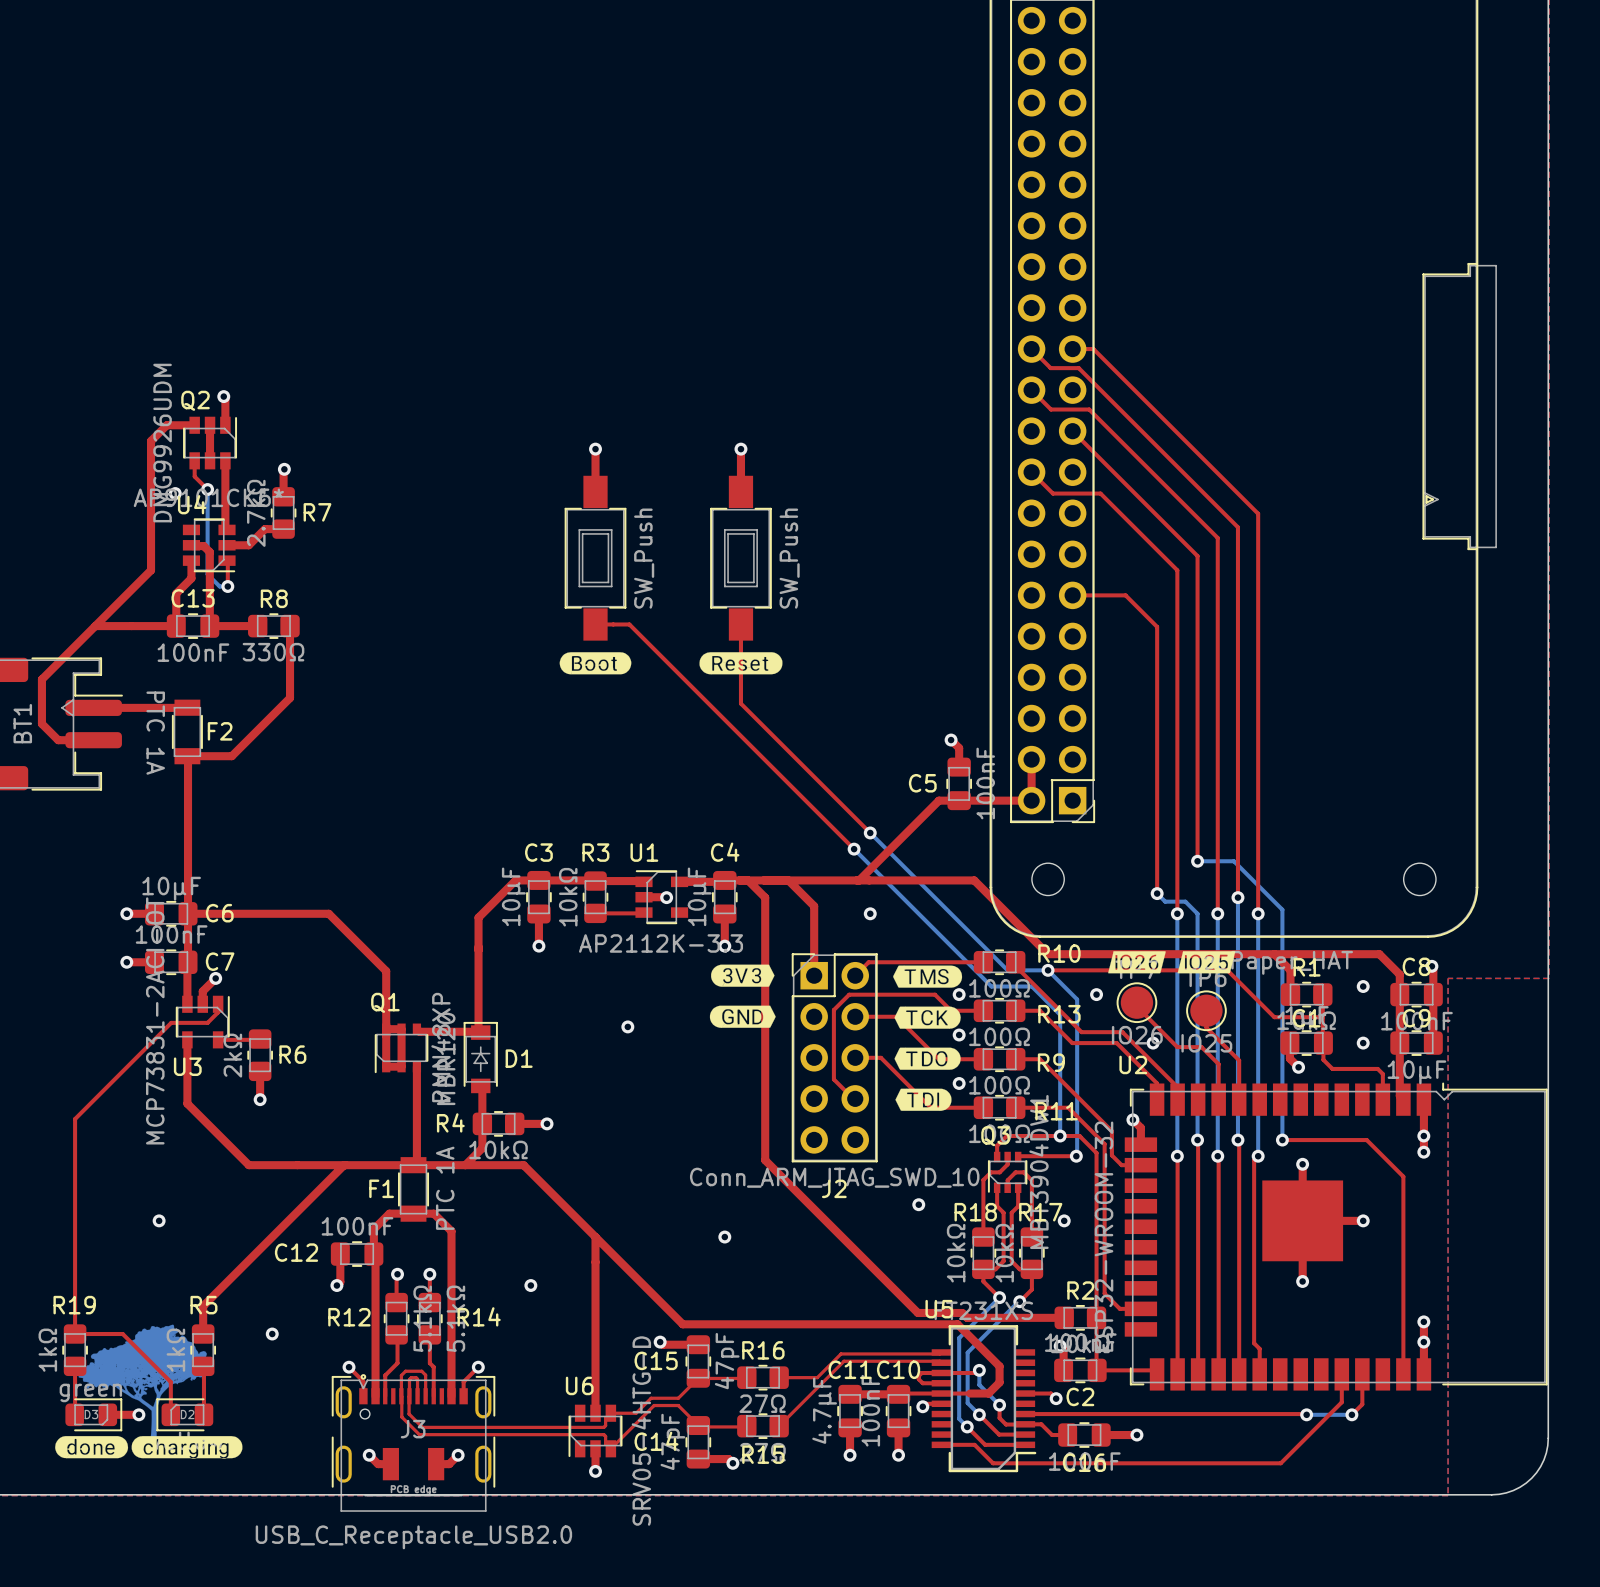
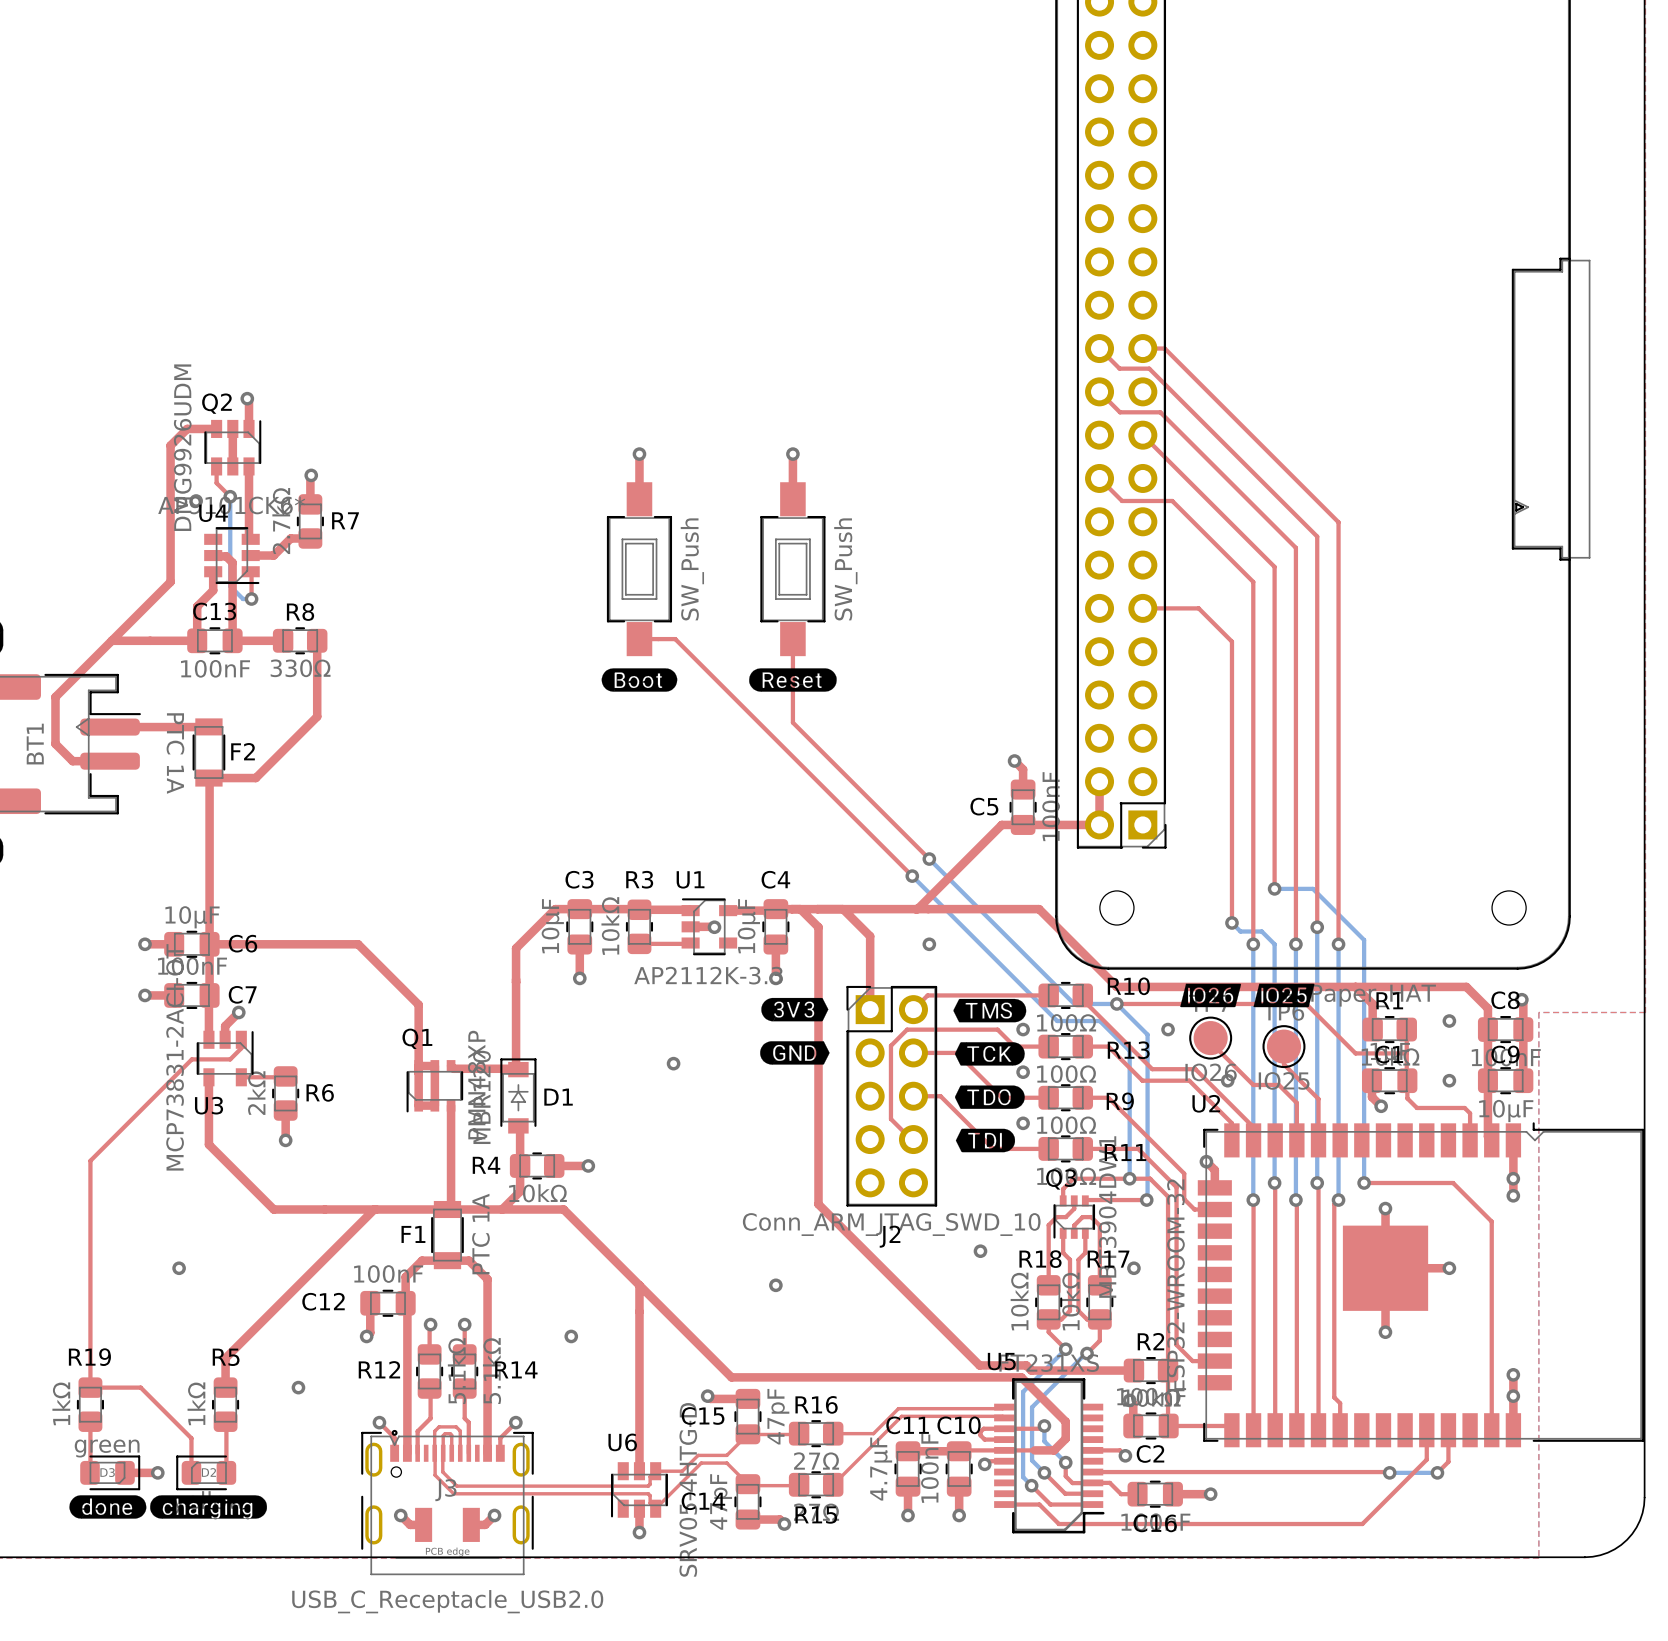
drawing: [78, 1324, 208, 1441] -> none

